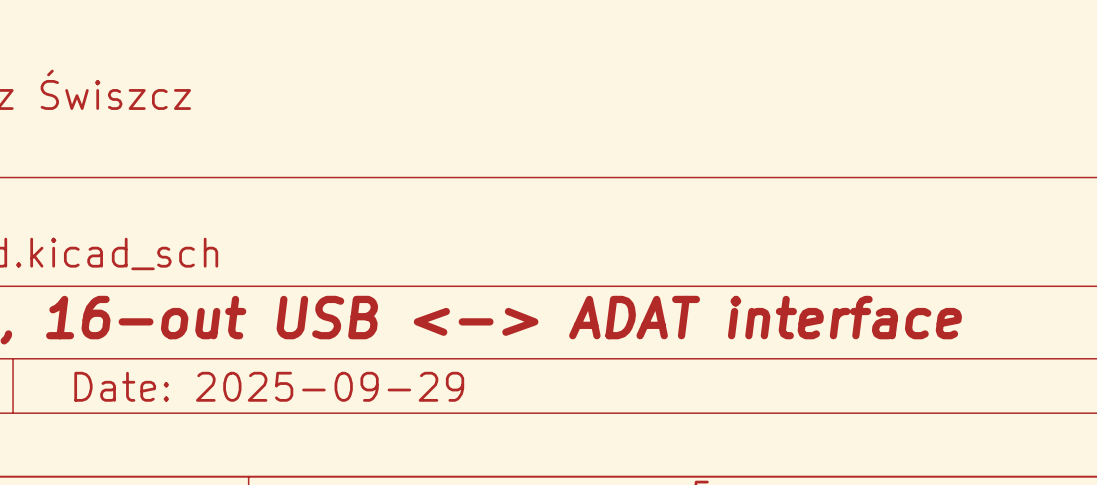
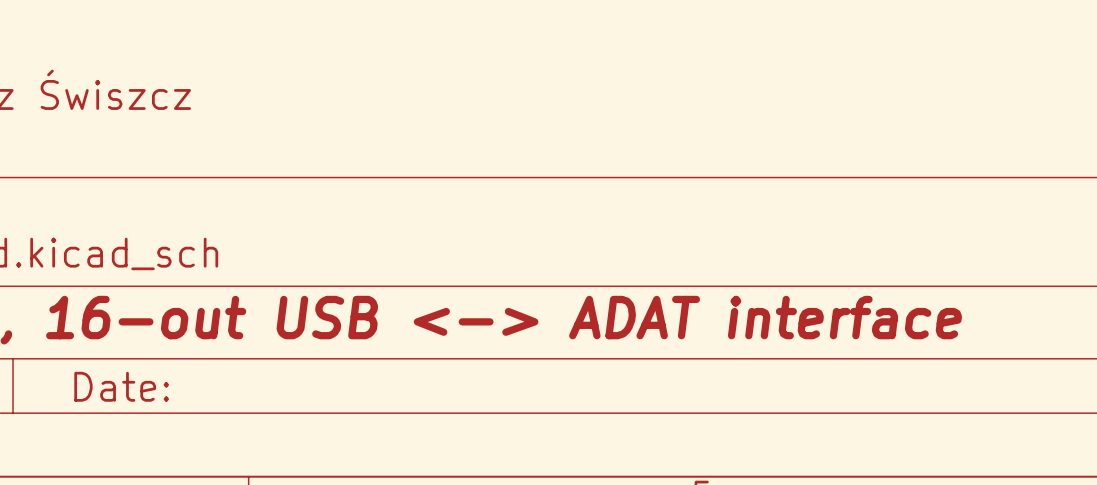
title block: Date: 2025-09-29 (269, 386) -> Date: (121, 386)

